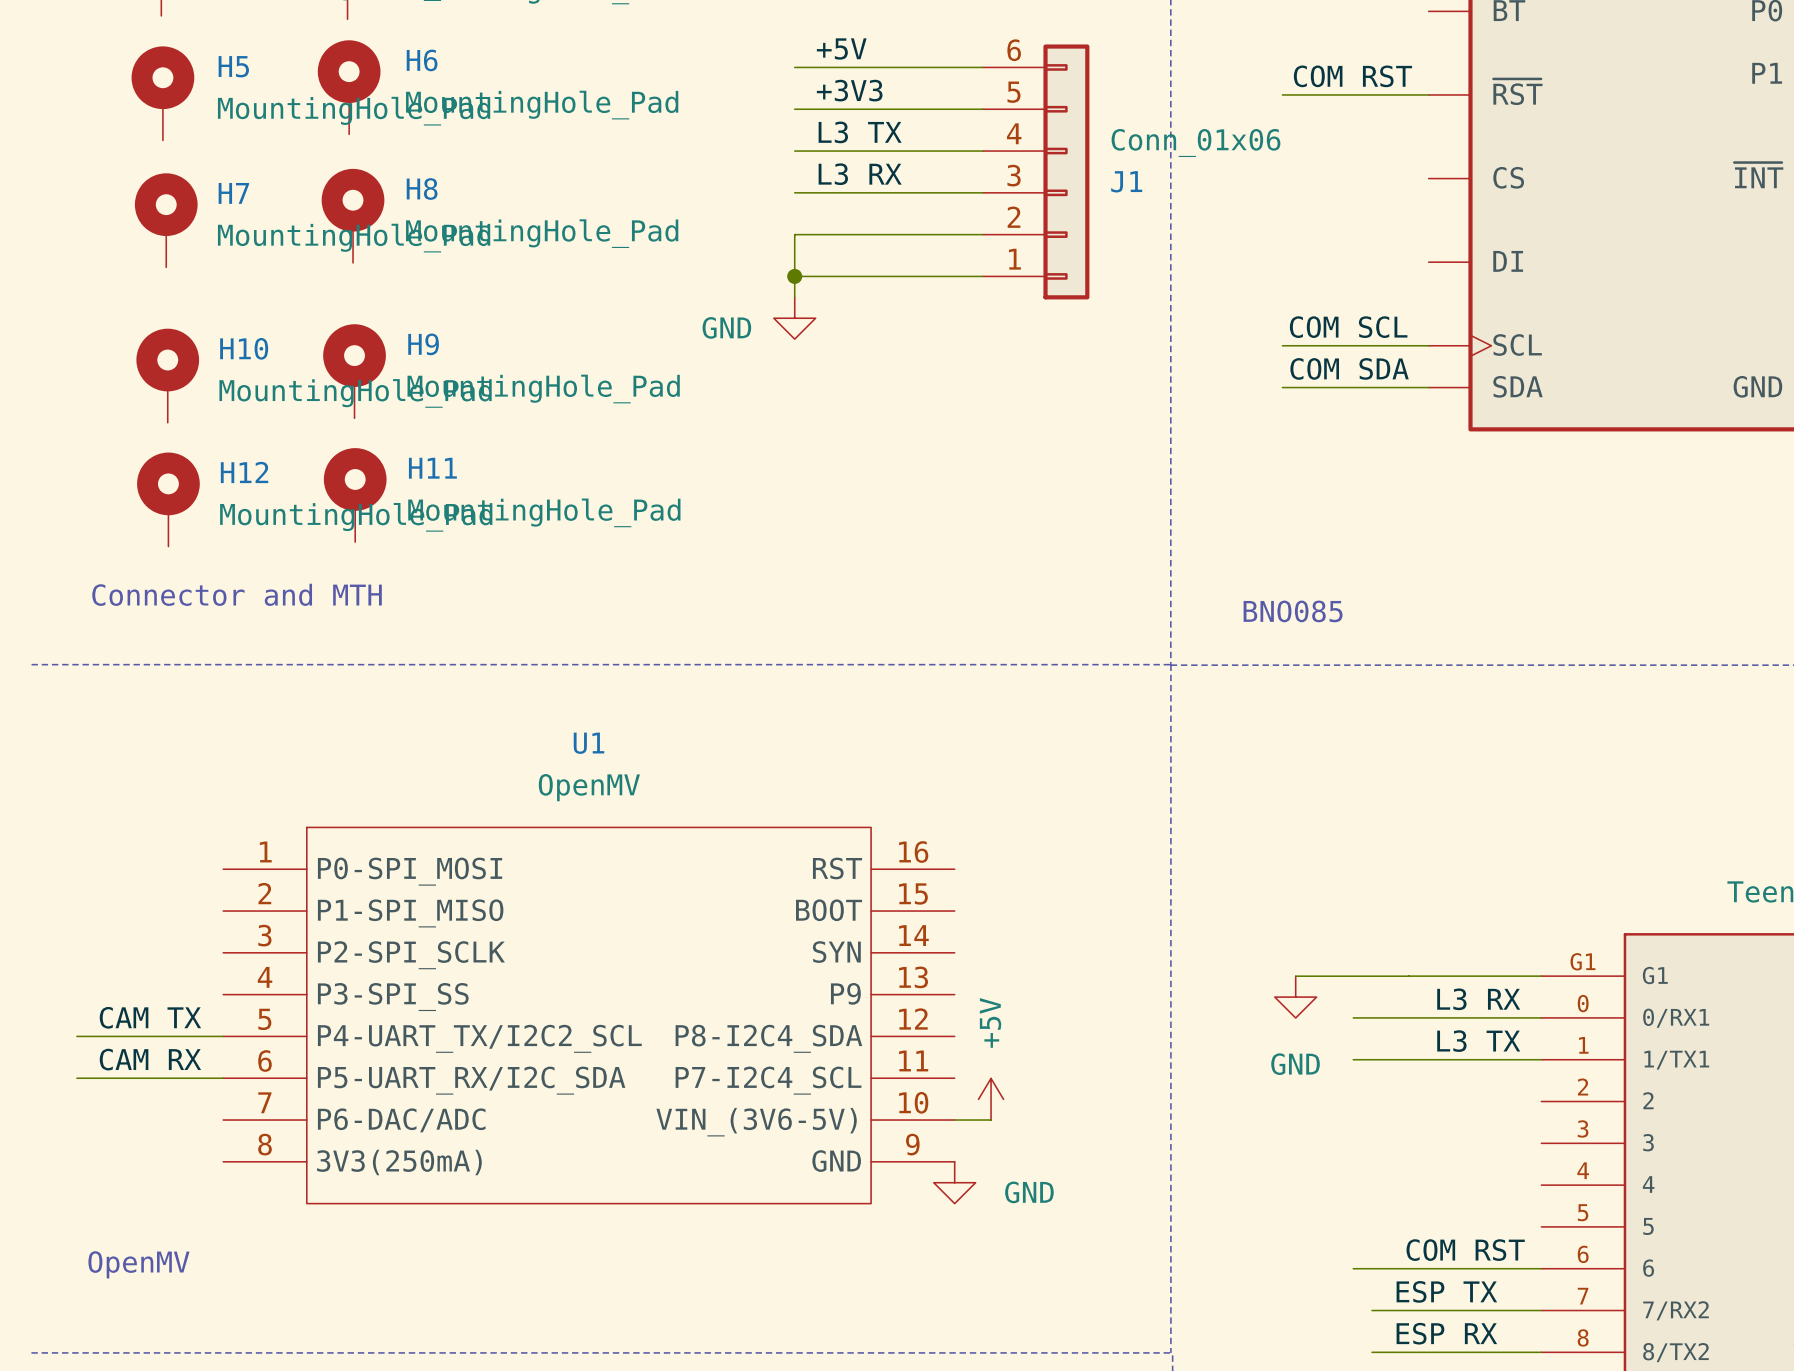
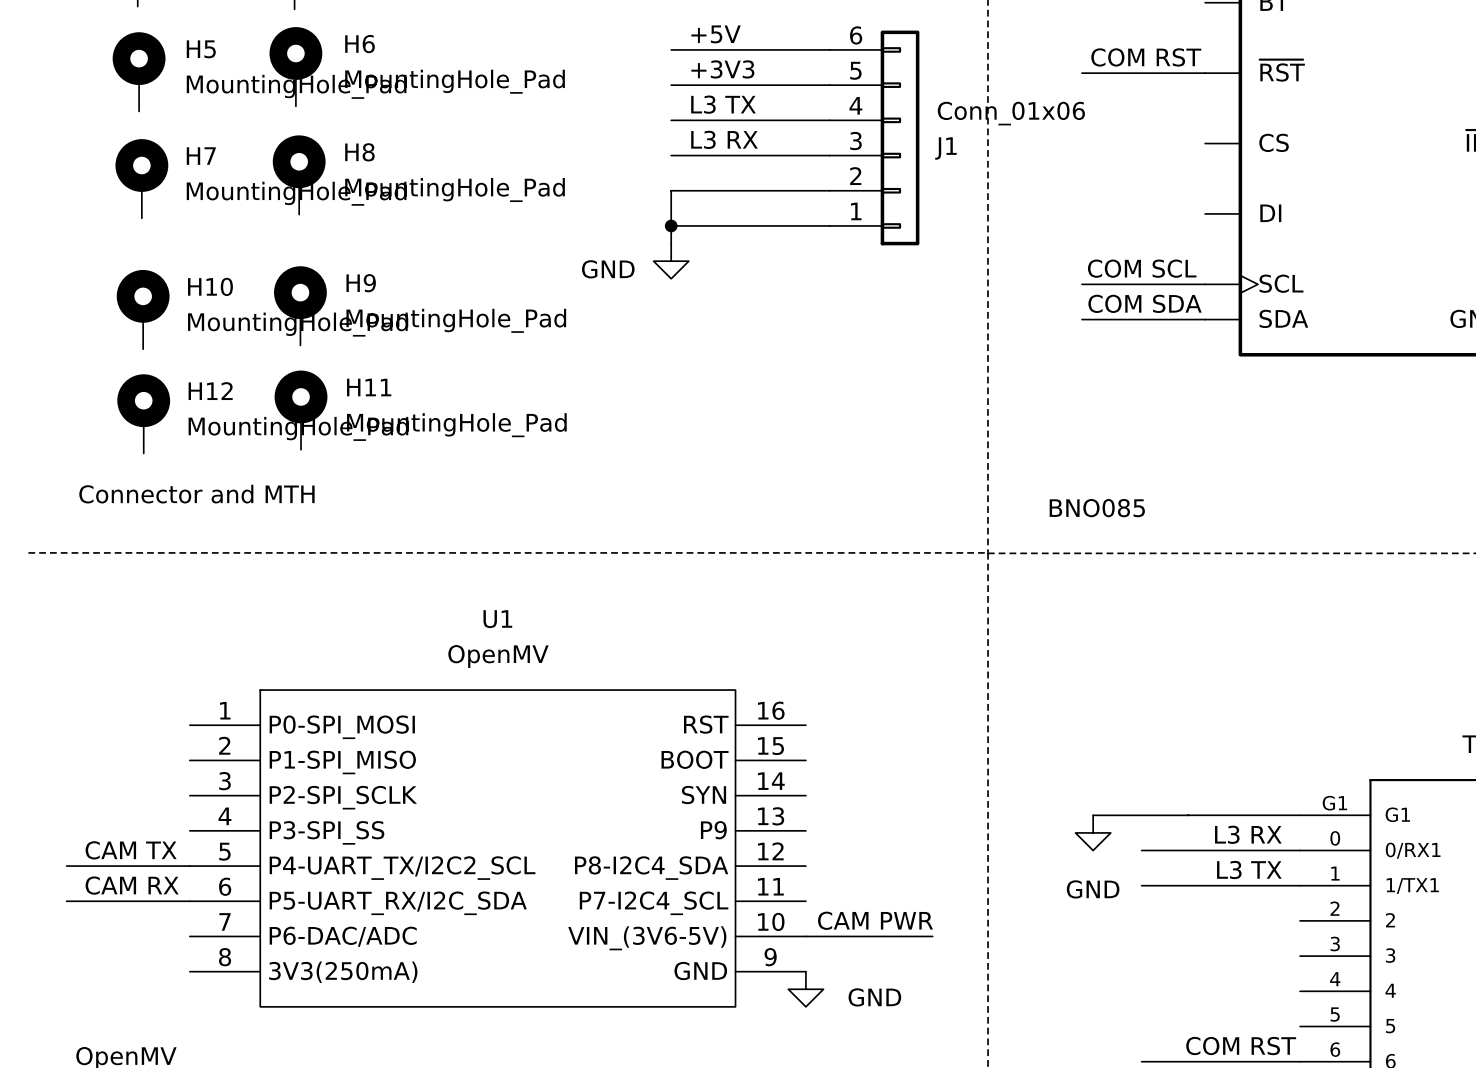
power symbol: +5V (991, 1099) -> none
label: none -> CAM PWR (875, 920)
wire: none -> (836, 936) (932, 936)

